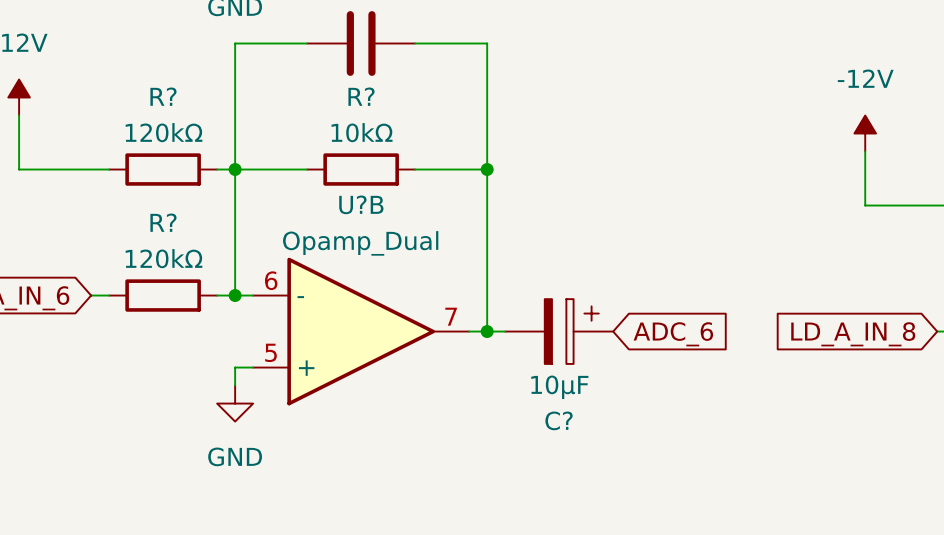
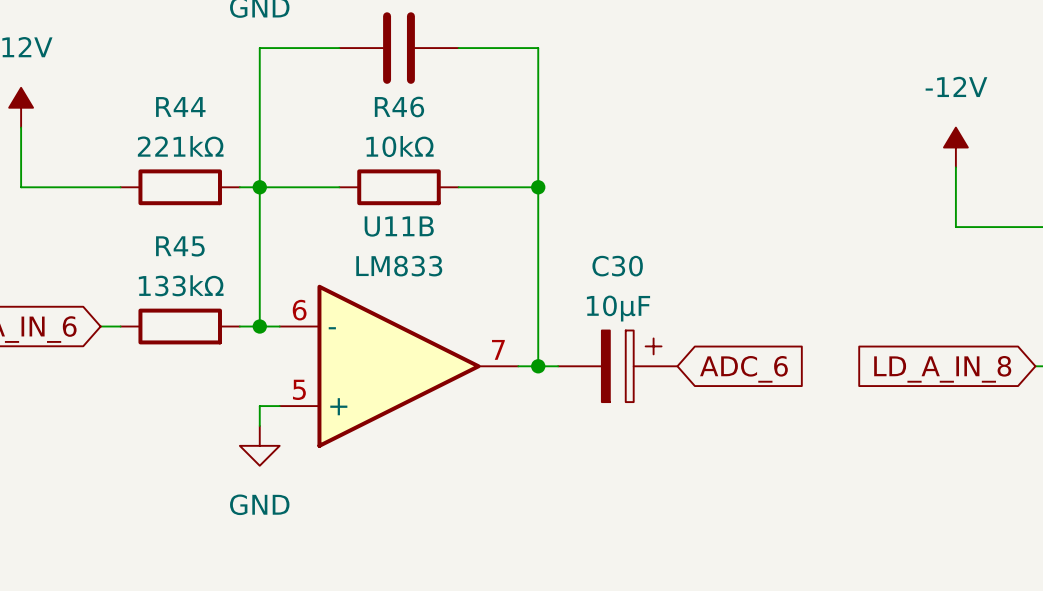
R? name: R? (163, 96) -> R44 (180, 106)
R? name: R? (361, 96) -> R46 (399, 107)
R? value: 120kΩ (164, 132) -> 221kΩ (180, 146)
U?B name: U?B (361, 204) -> U11B (399, 226)
R? name: R? (163, 222) -> R45 (180, 246)
U?B value: Opamp_Dual (360, 243) -> LM833 (399, 266)
R? value: 120kΩ (164, 258) -> 133kΩ (181, 285)
C? value position: 10µF (559, 387) -> 10µF (618, 308)
C? name: C? (559, 420) -> C30 (617, 266)

